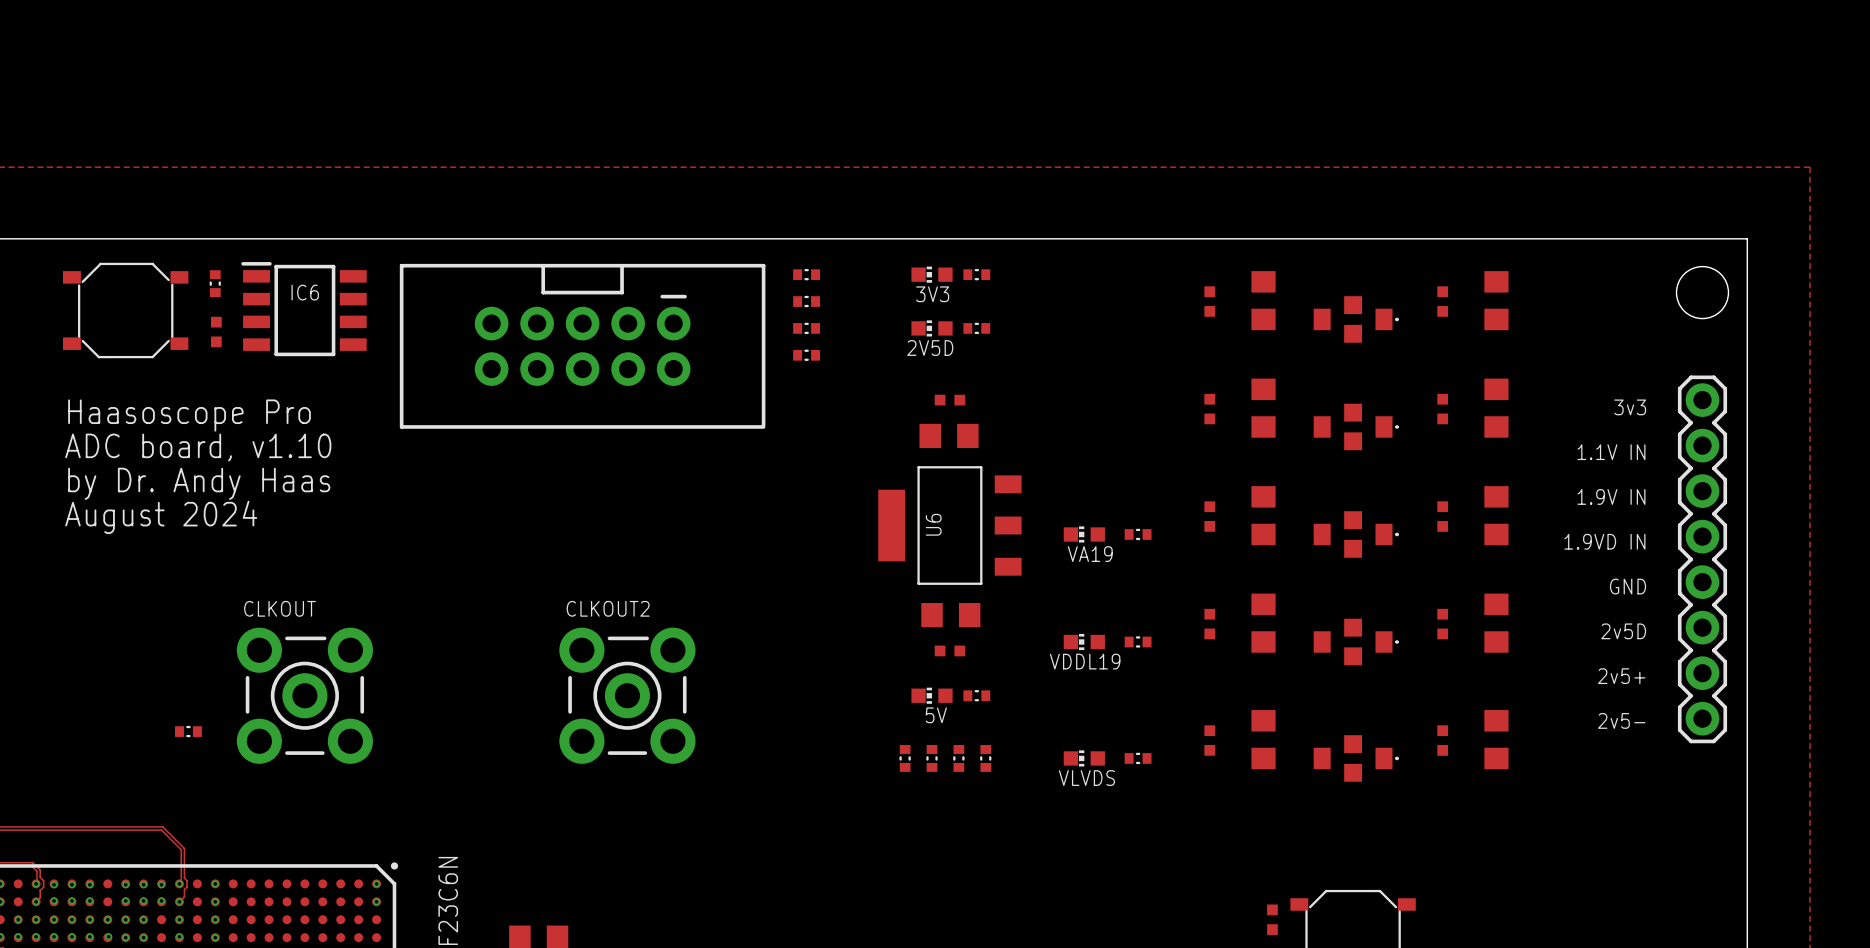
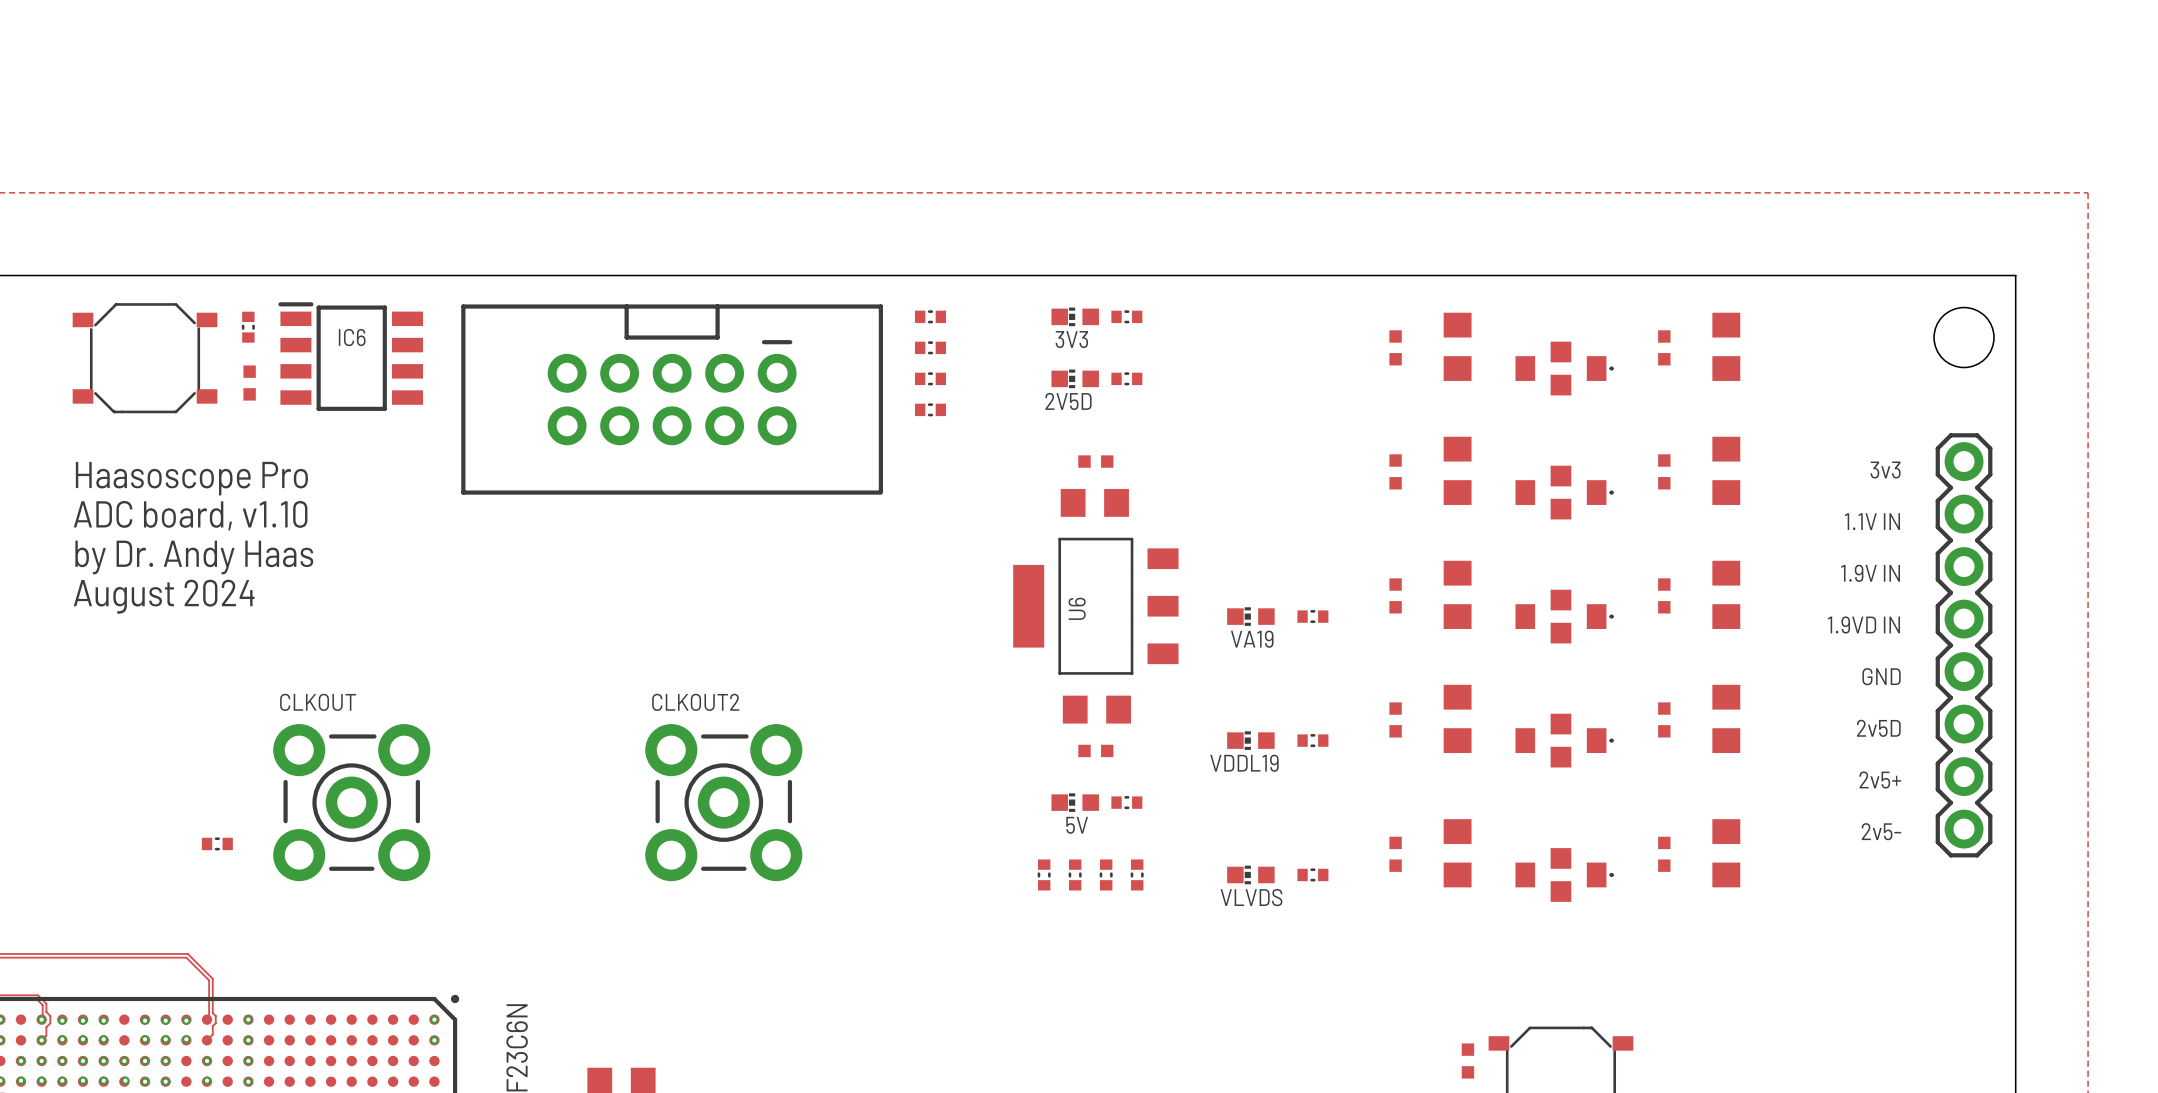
via: (179, 883) -> none
via: (179, 901) -> none

